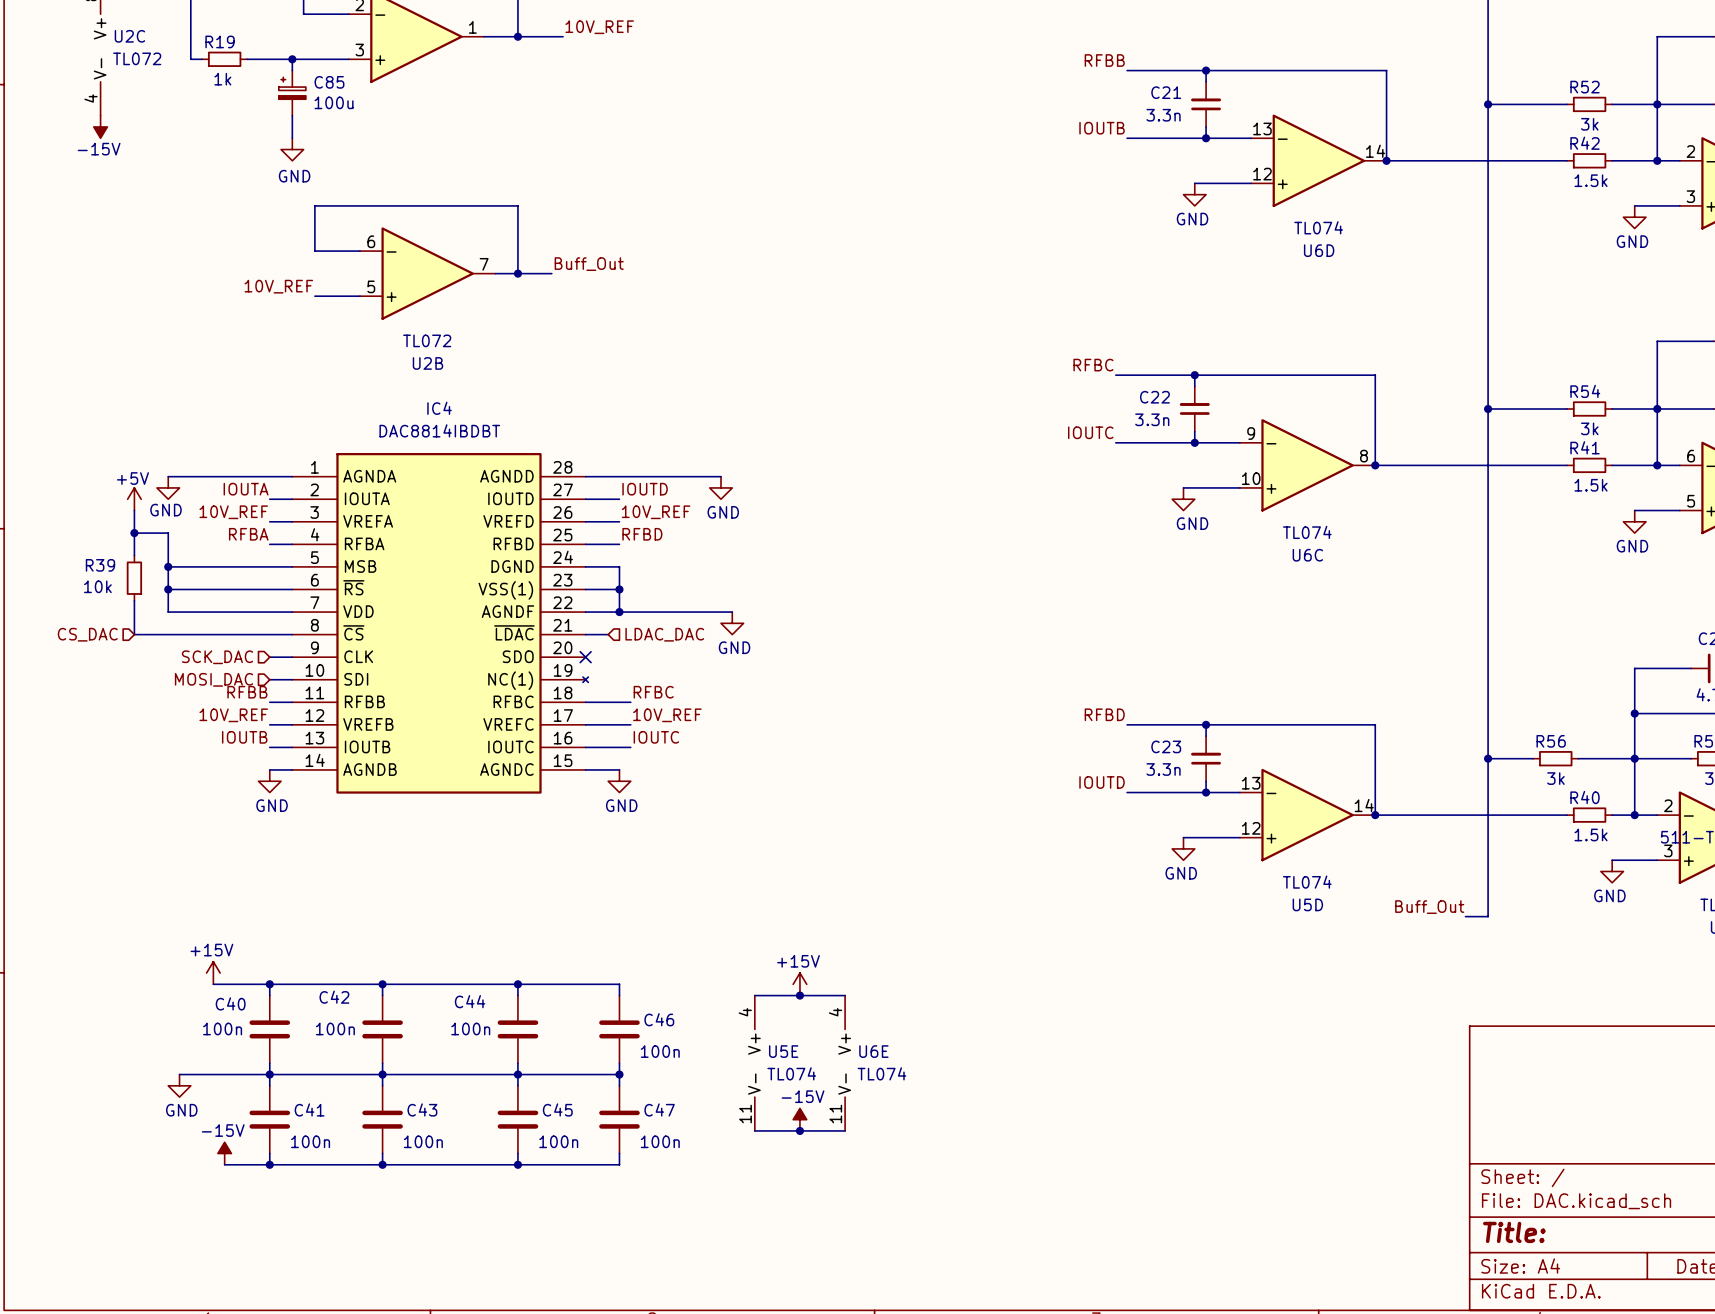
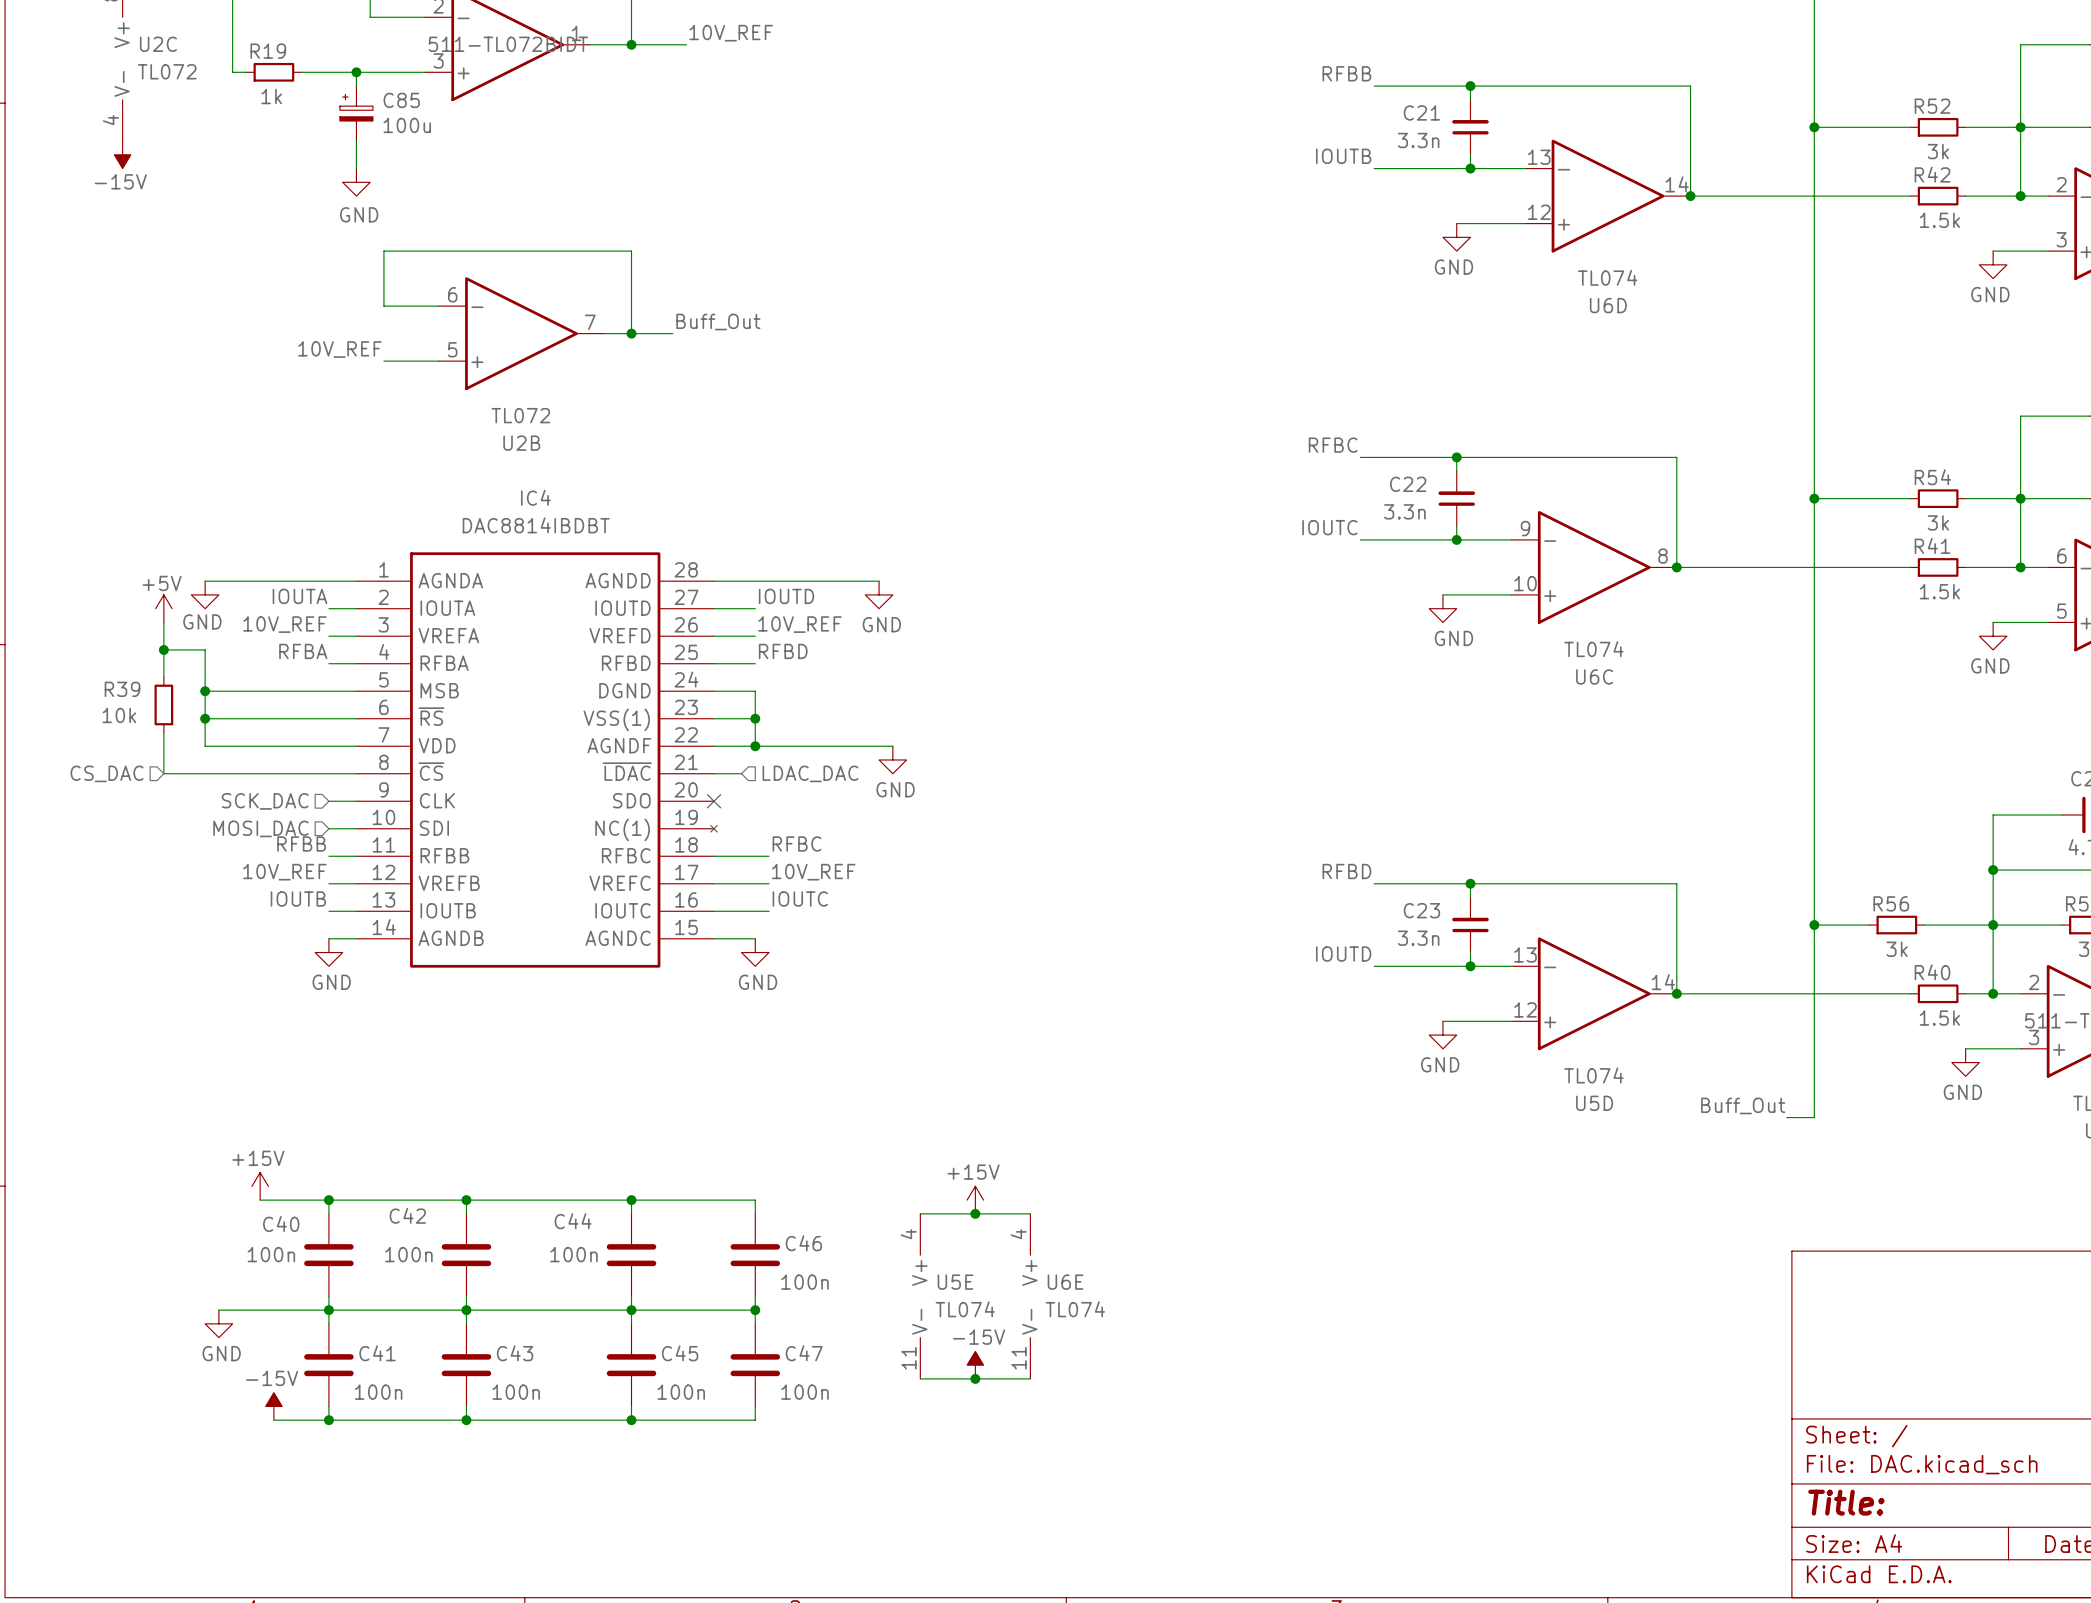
part text: none -> 511-TL072BIDT (508, 44)

